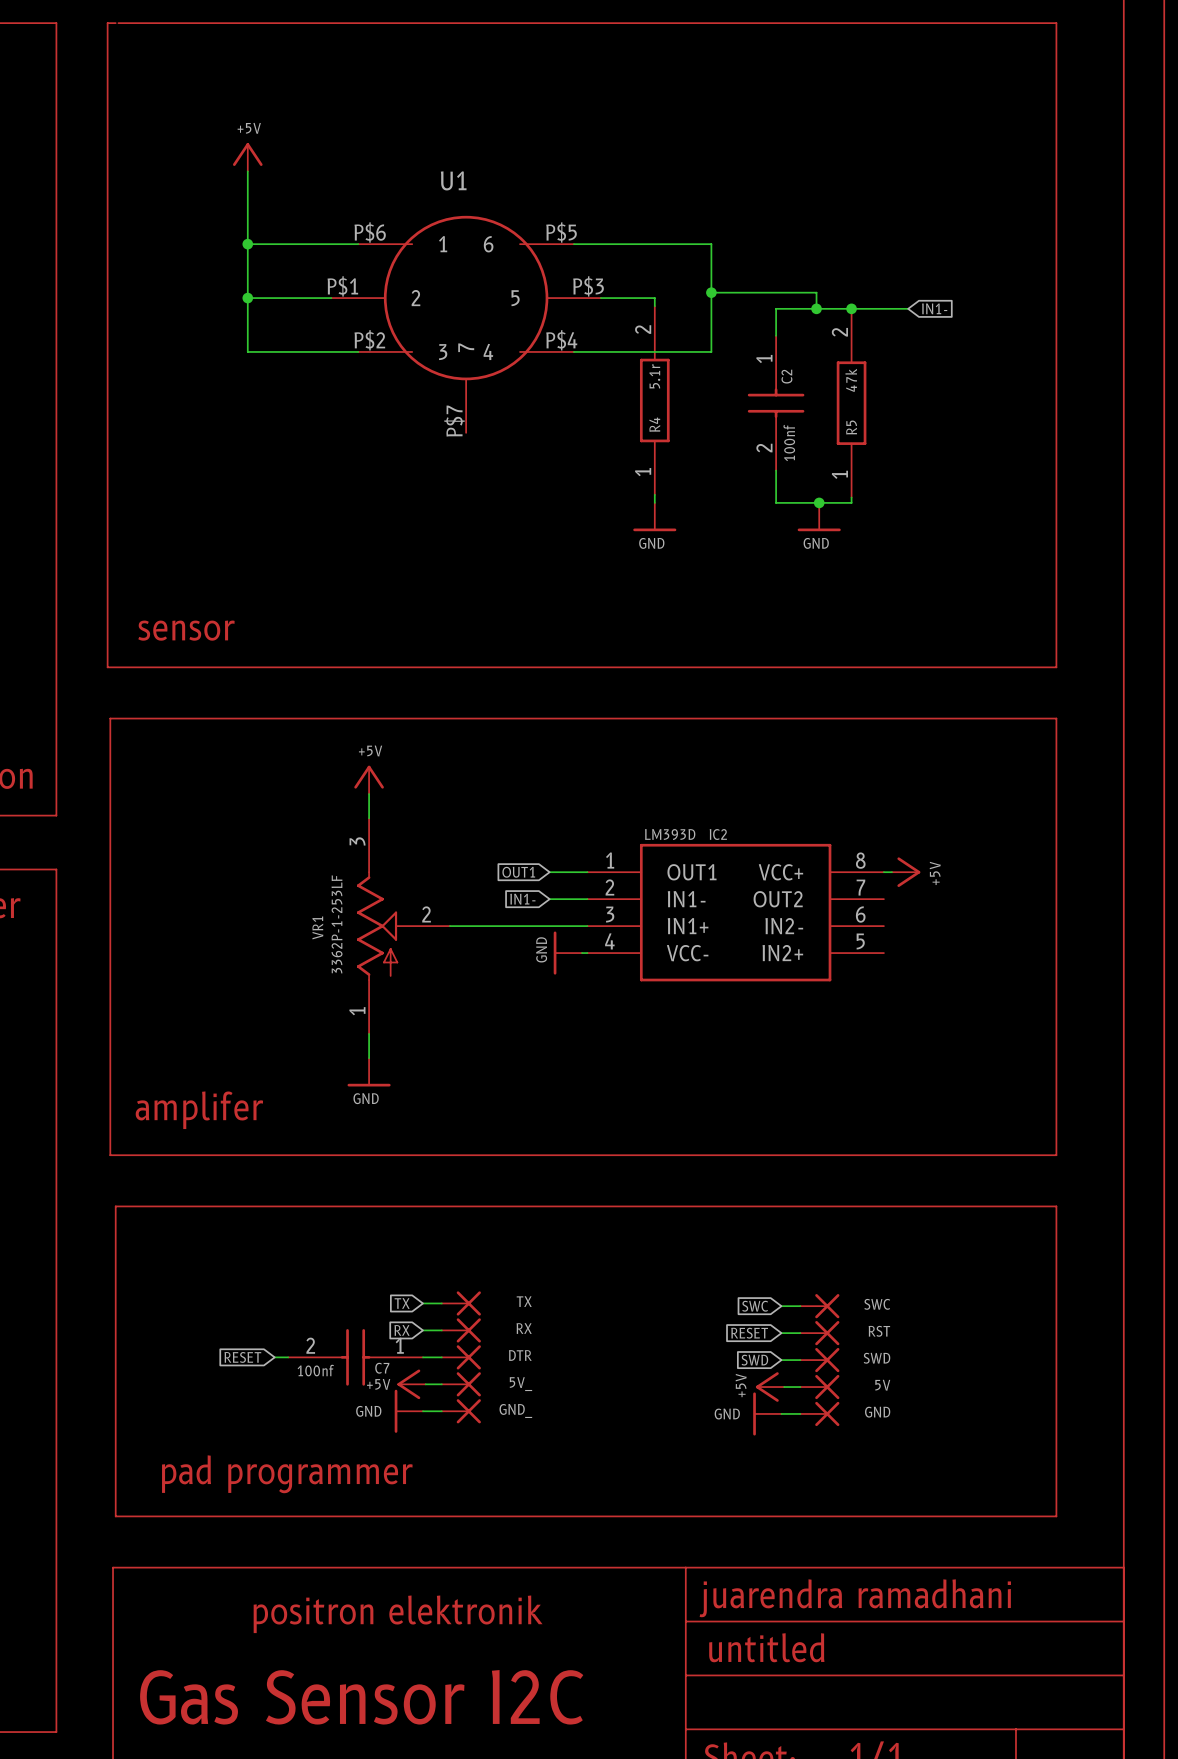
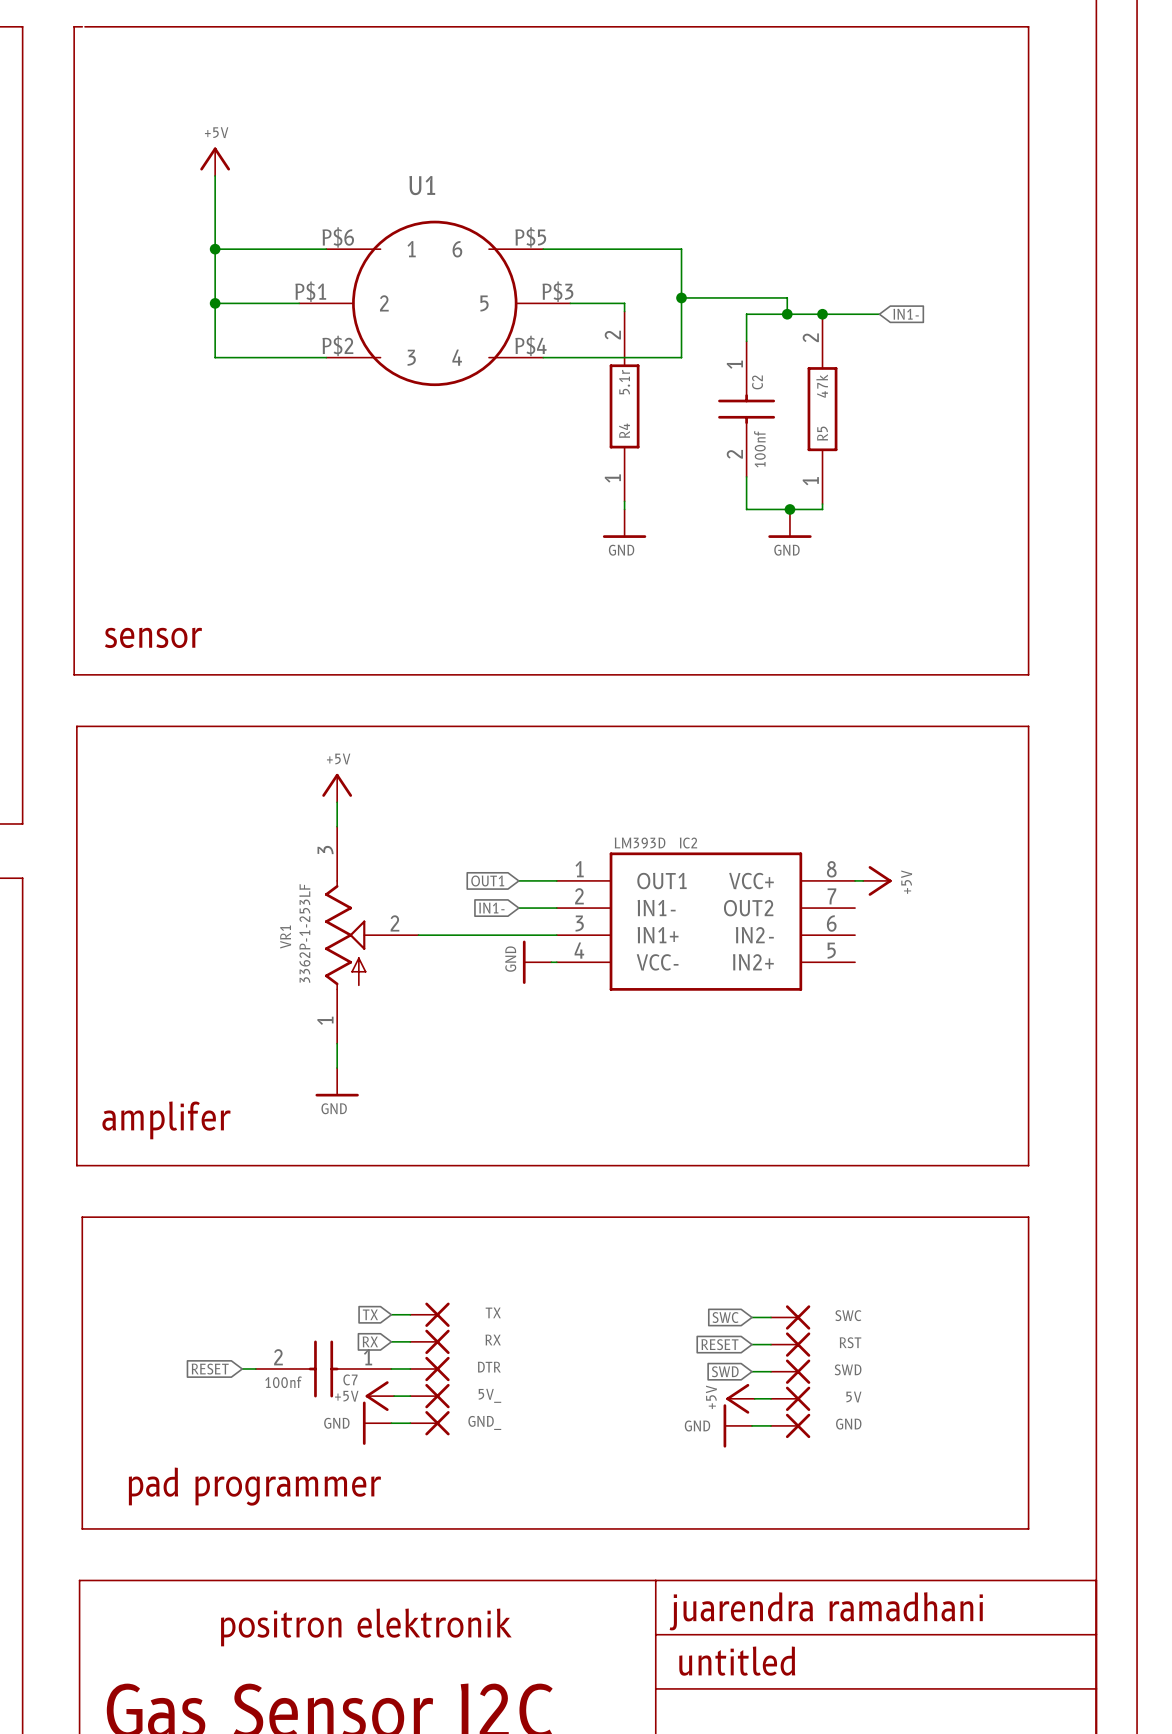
U1 symbol: [331, 215, 601, 433] -> [299, 220, 571, 387]

